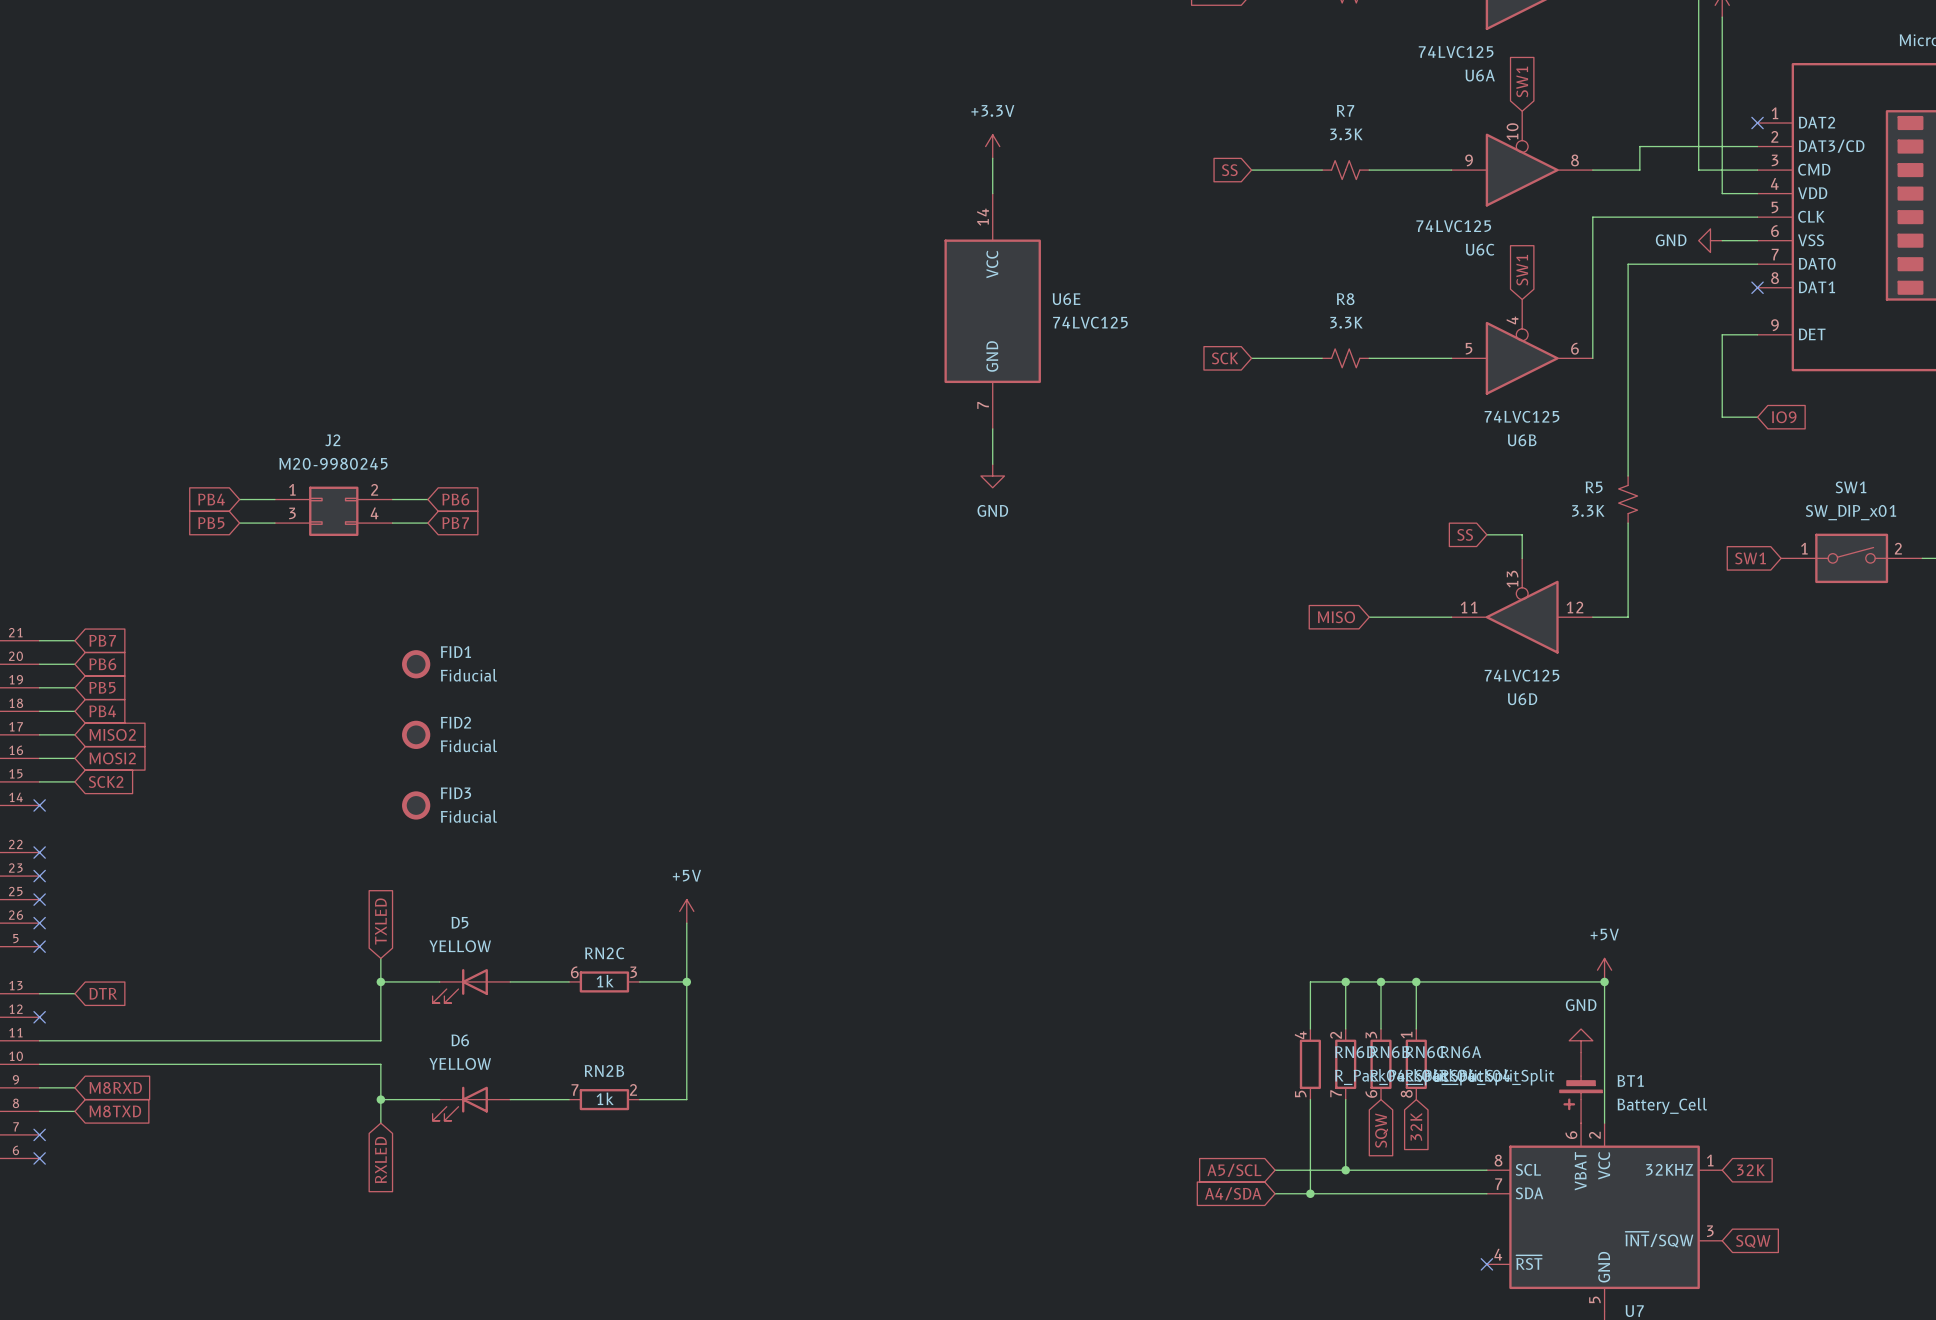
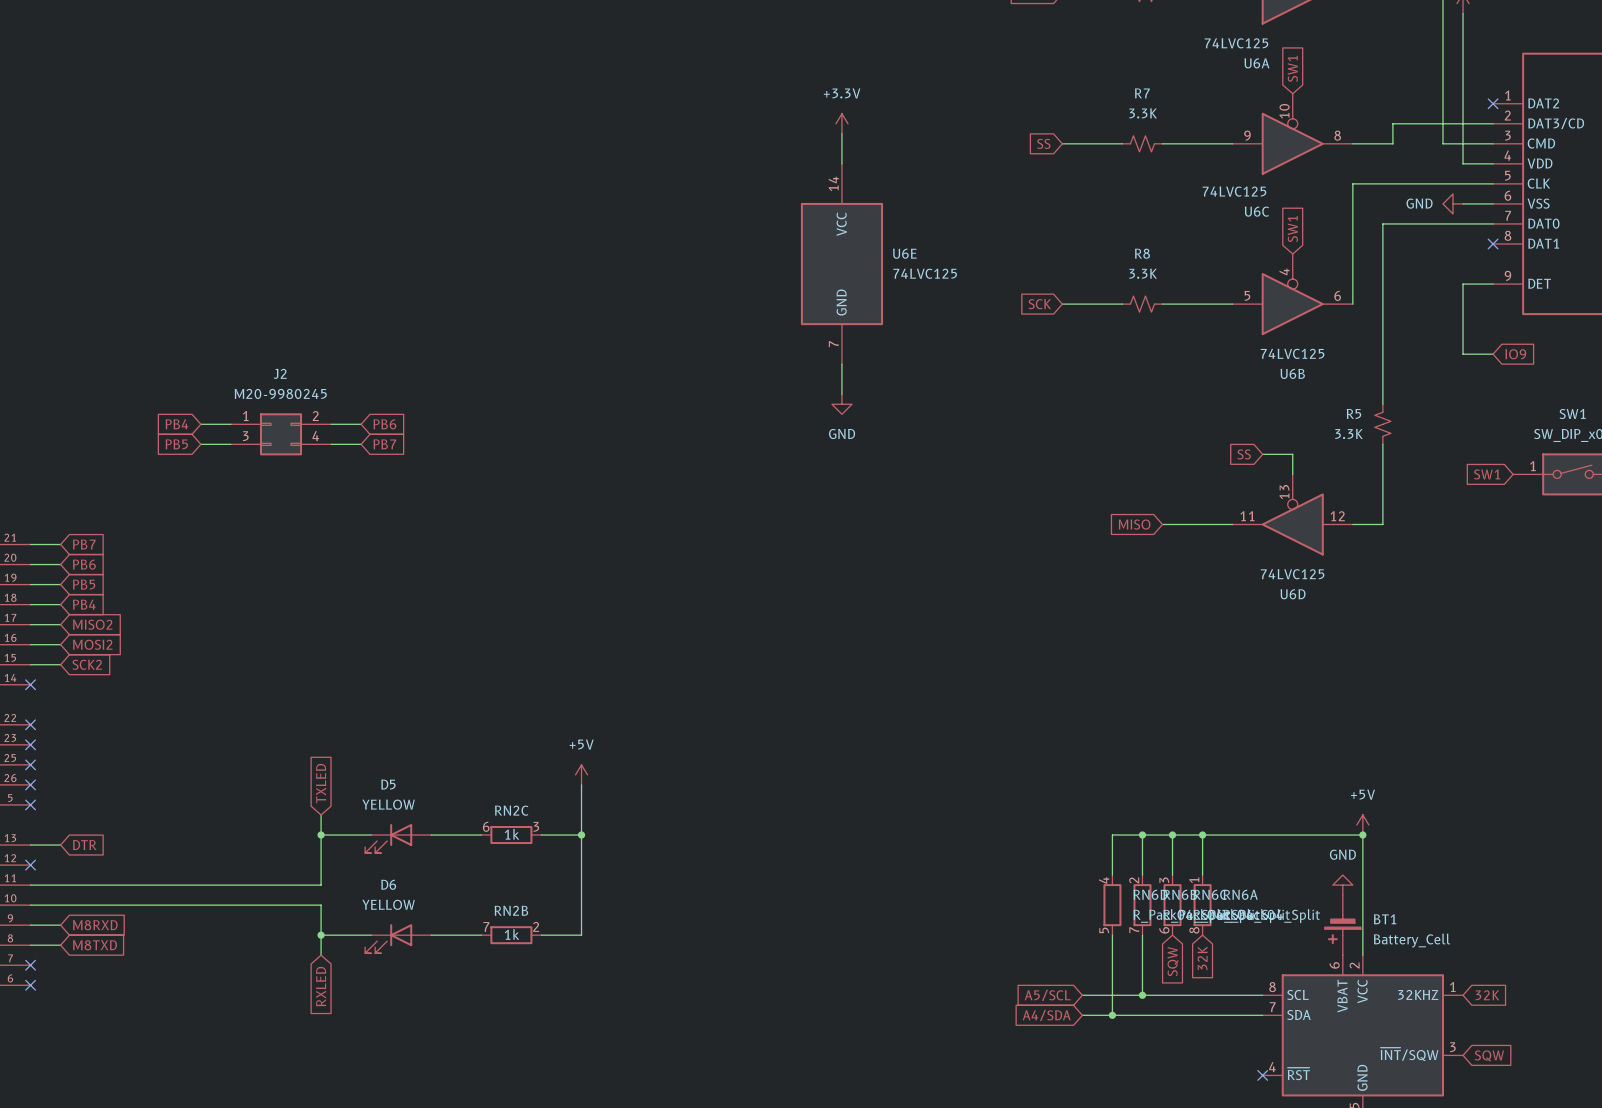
FID1: Fiducial (416, 664) -> none
FID2: Fiducial (416, 734) -> none
FID3: Fiducial (416, 805) -> none

